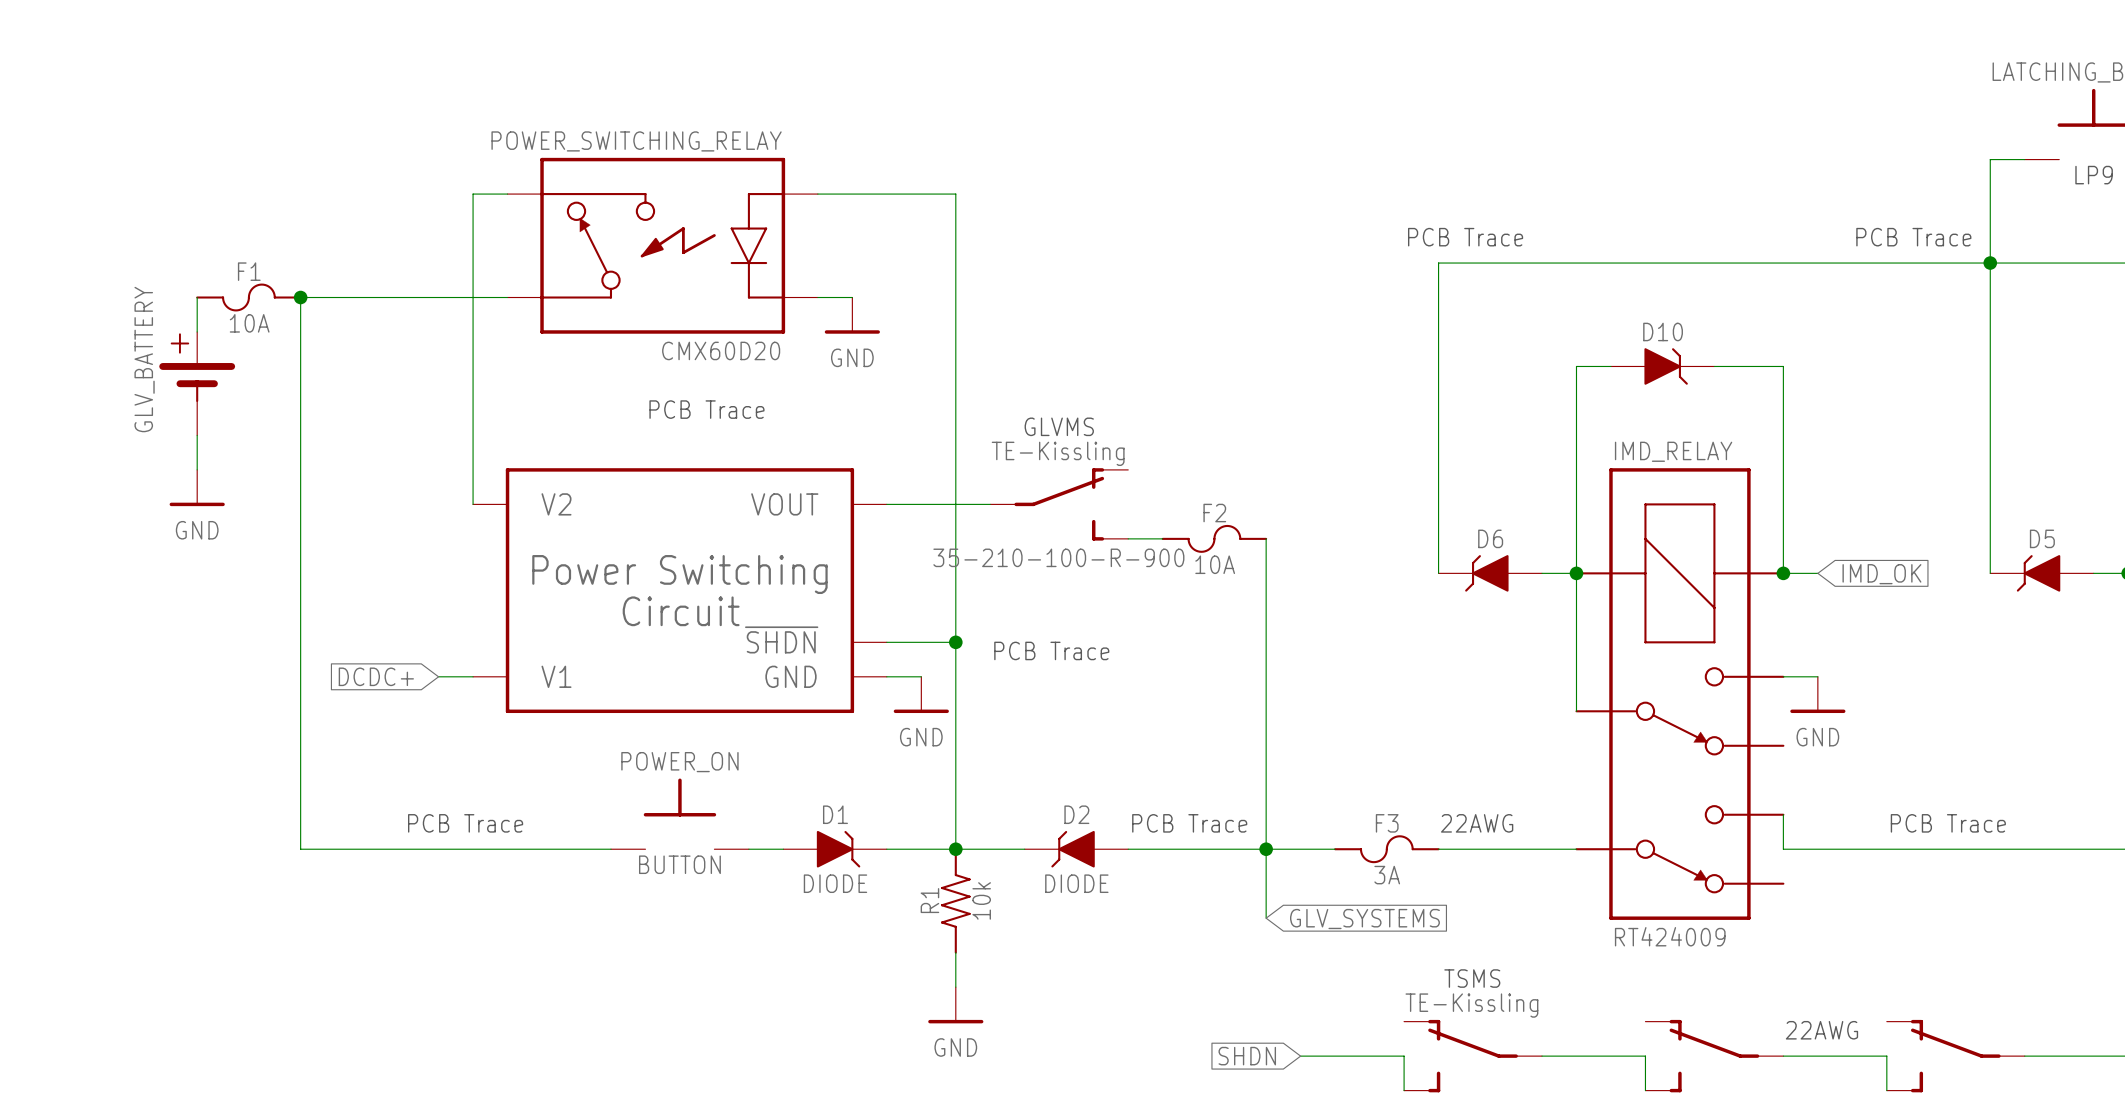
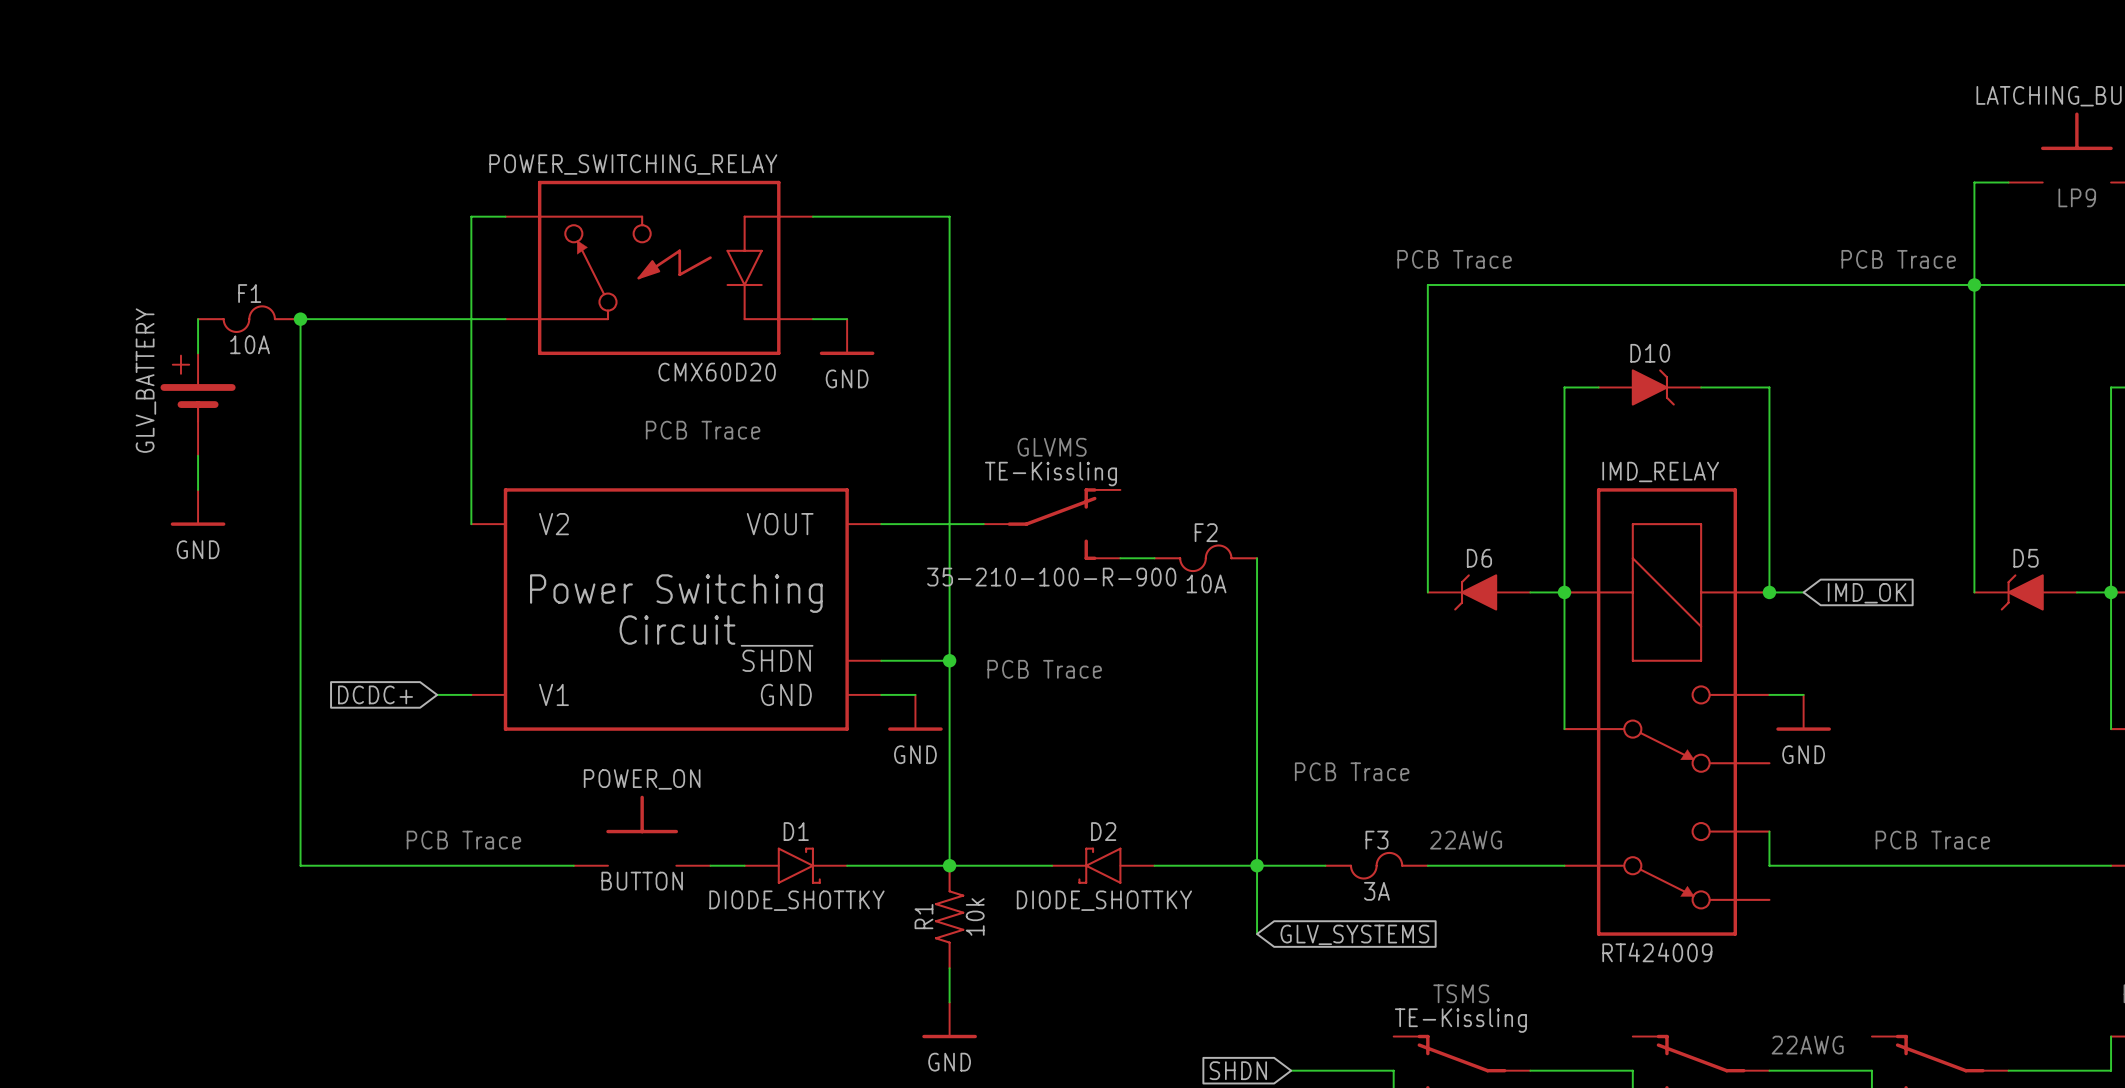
POWER_ON position: (679, 813) -> (642, 830)
text position: PCB Trace (1189, 823) -> PCB Trace (1352, 771)
D1 symbol: [783, 830, 887, 868] -> [744, 847, 848, 884]
D2 symbol: [1024, 830, 1129, 868] -> [1052, 847, 1155, 884]
D1 value: DIODE (835, 883) -> DIODE_SHOTTKY (796, 900)
D2 value: DIODE (1076, 883) -> DIODE_SHOTTKY (1104, 900)

